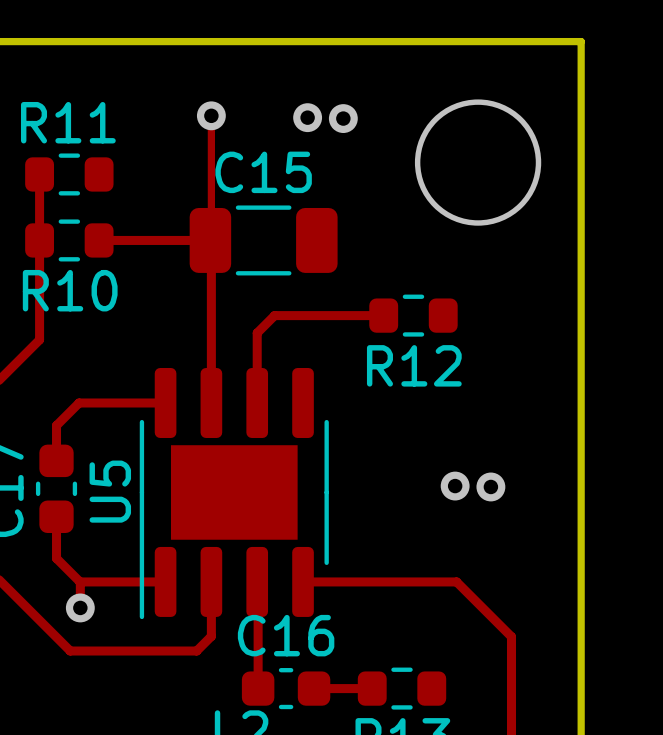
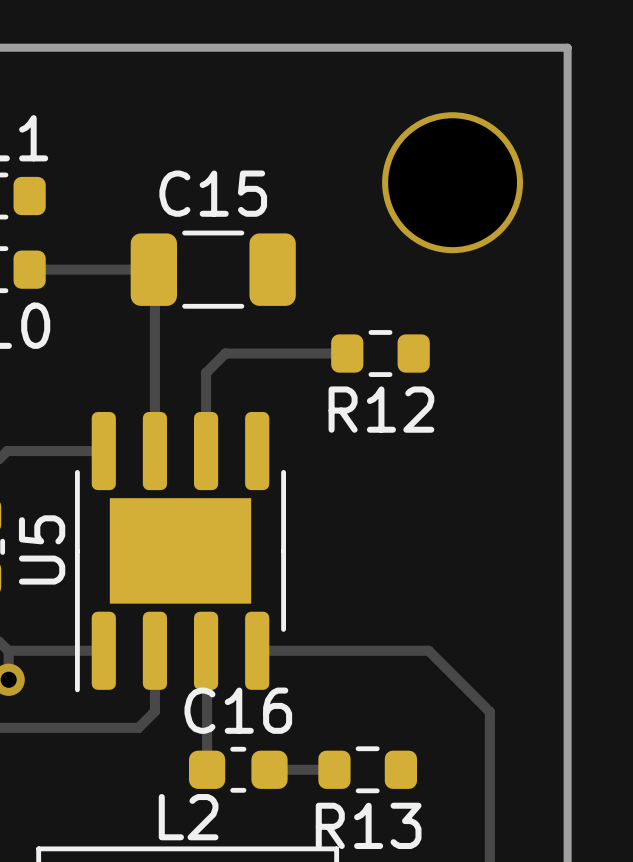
track: (211, 115) (210, 240) -> none
via: (211, 115) -> none
via: (307, 117) -> none
via: (343, 118) -> none
via: (455, 486) -> none
via: (490, 486) -> none

